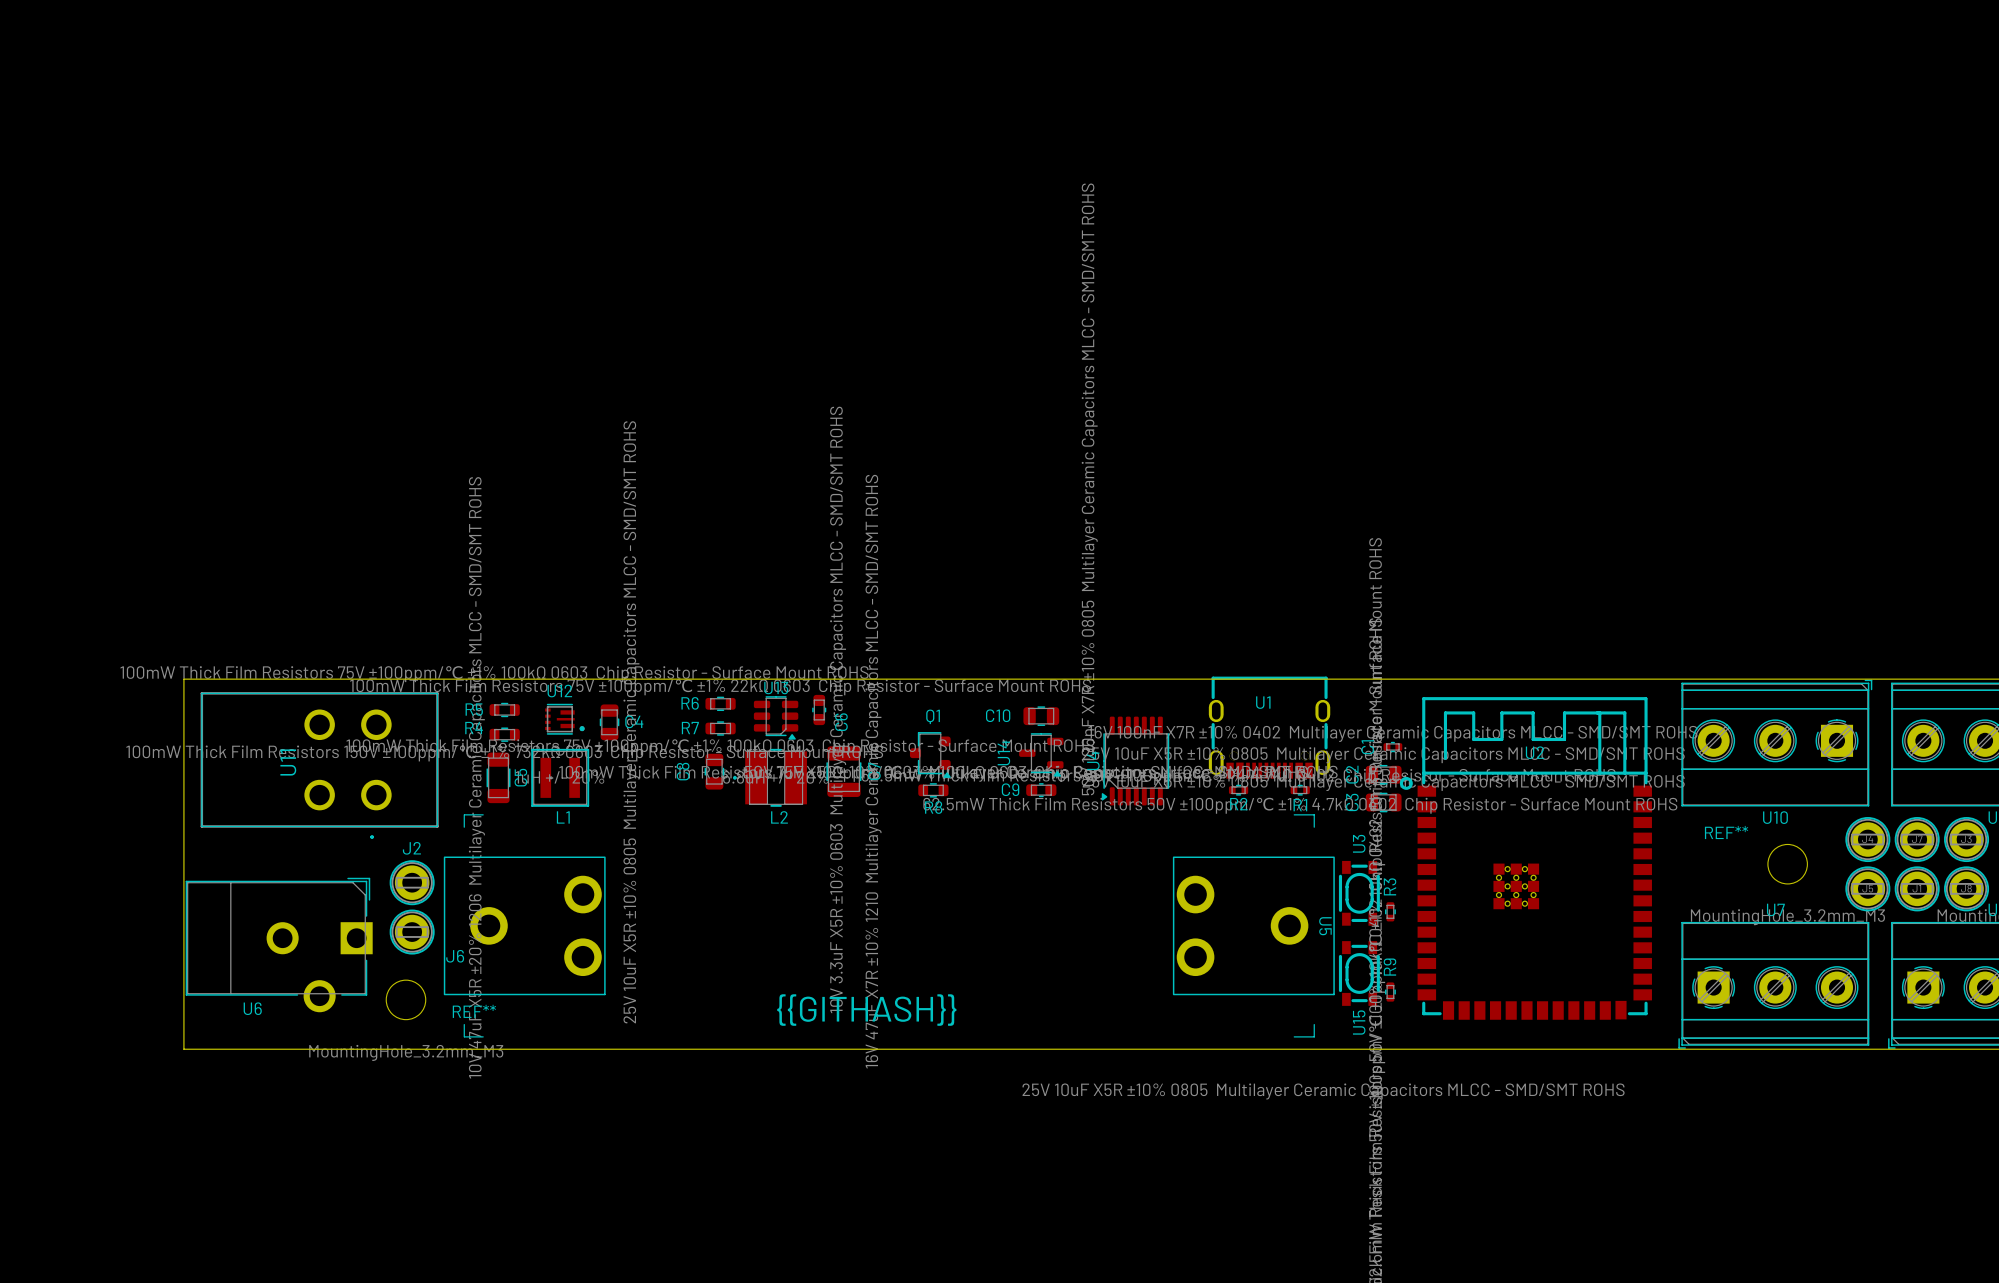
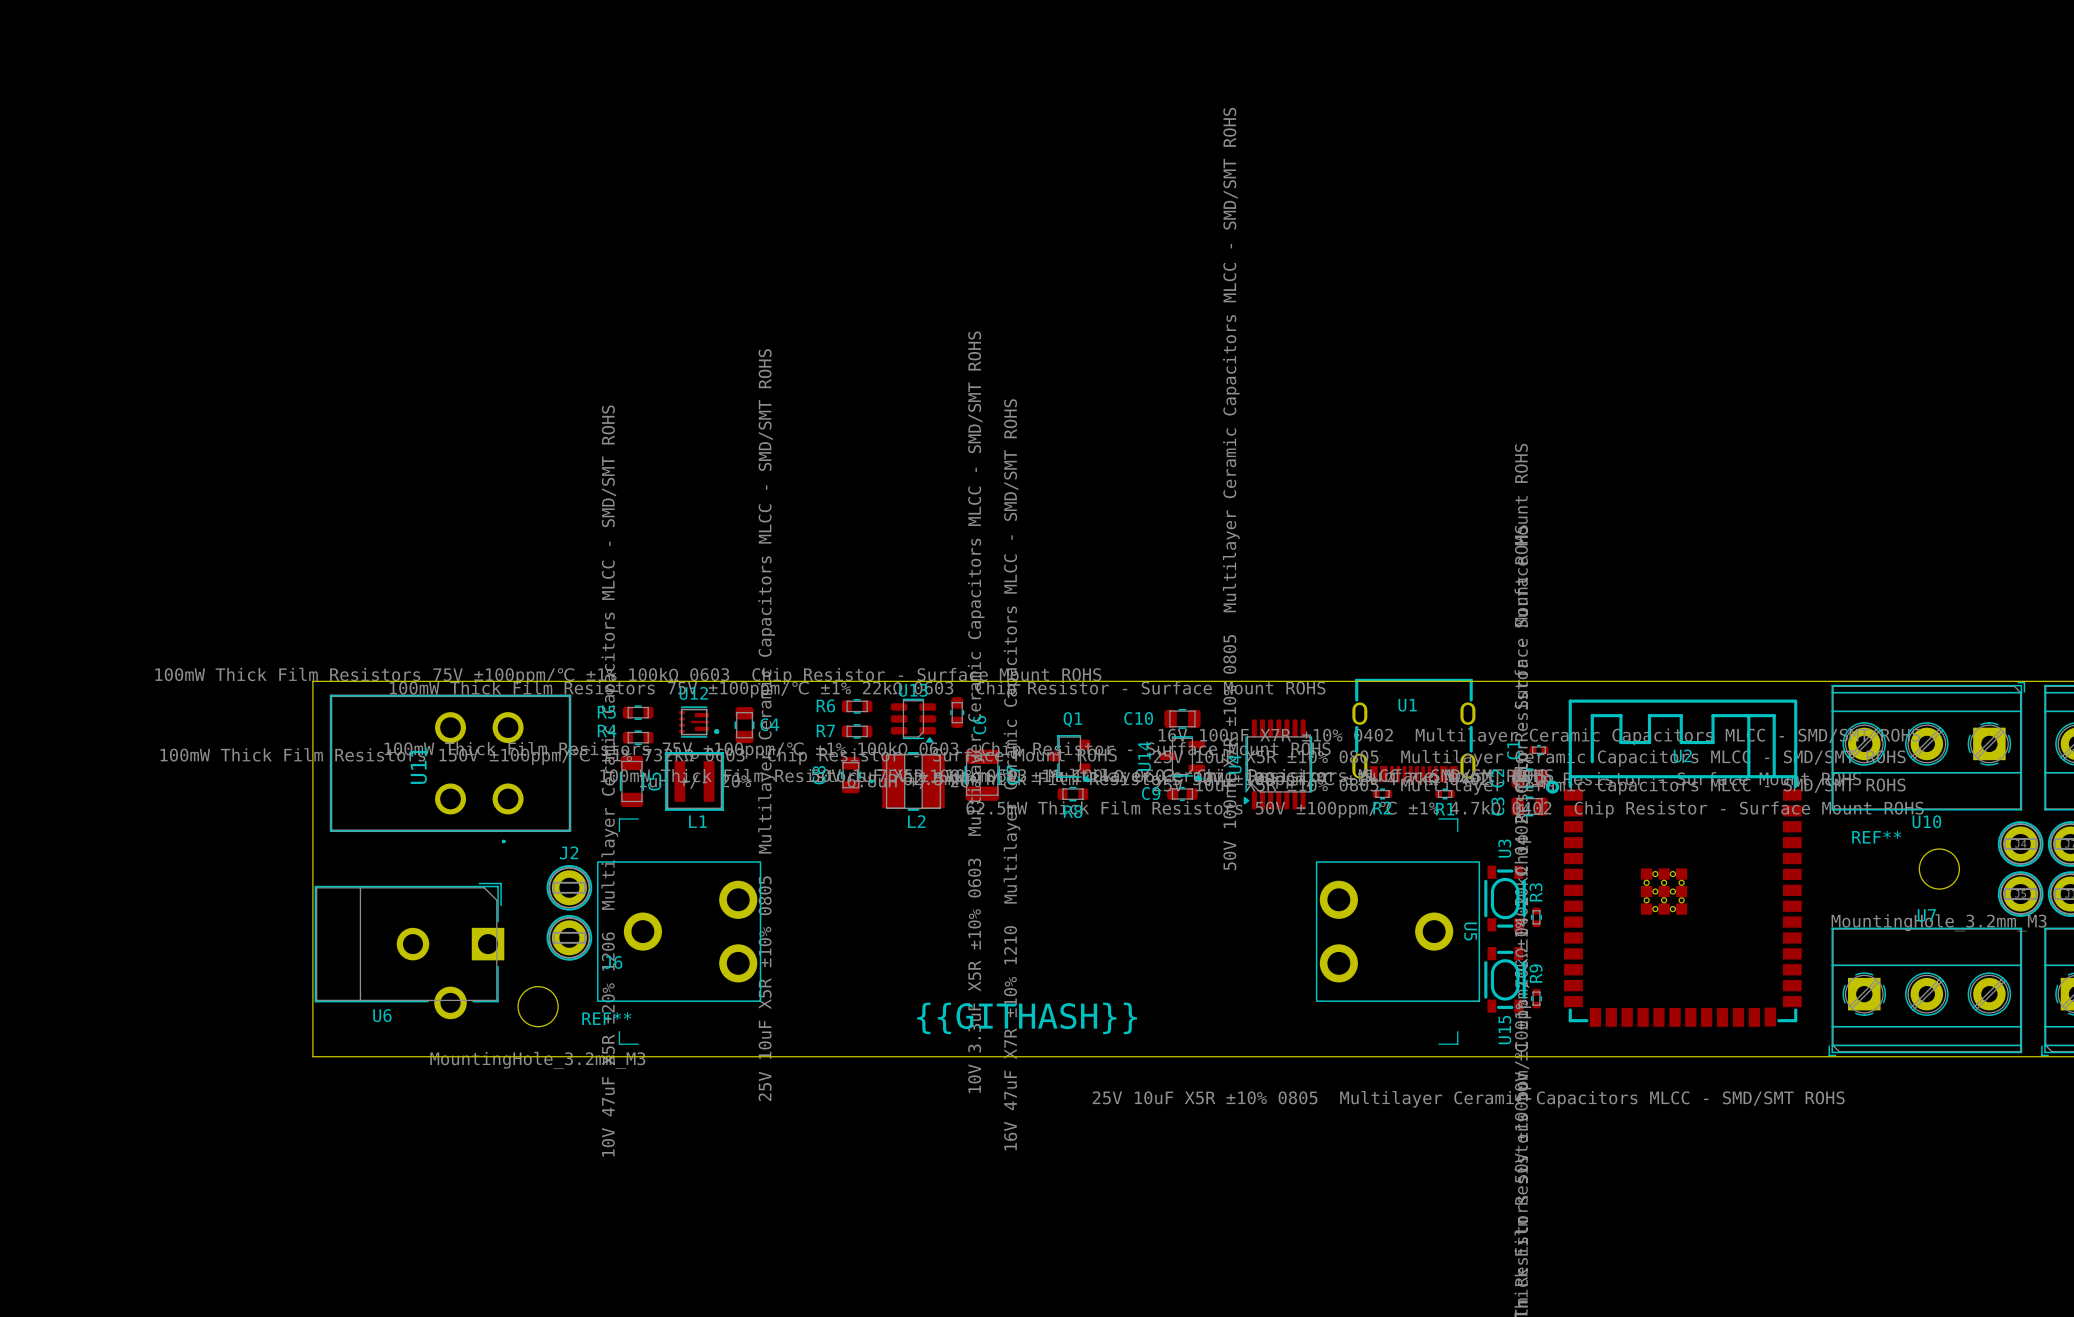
U5 footprint: [443, 814, 1335, 1038] -> [597, 818, 1481, 1045]
J2 position: (412, 882) -> (569, 887)
J6 position: (412, 932) -> (569, 937)

